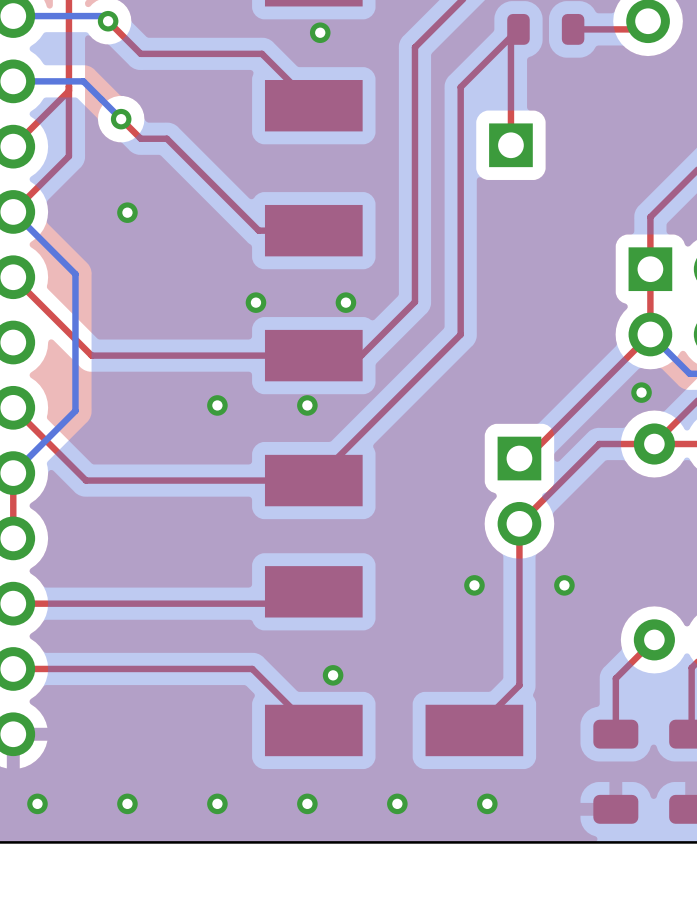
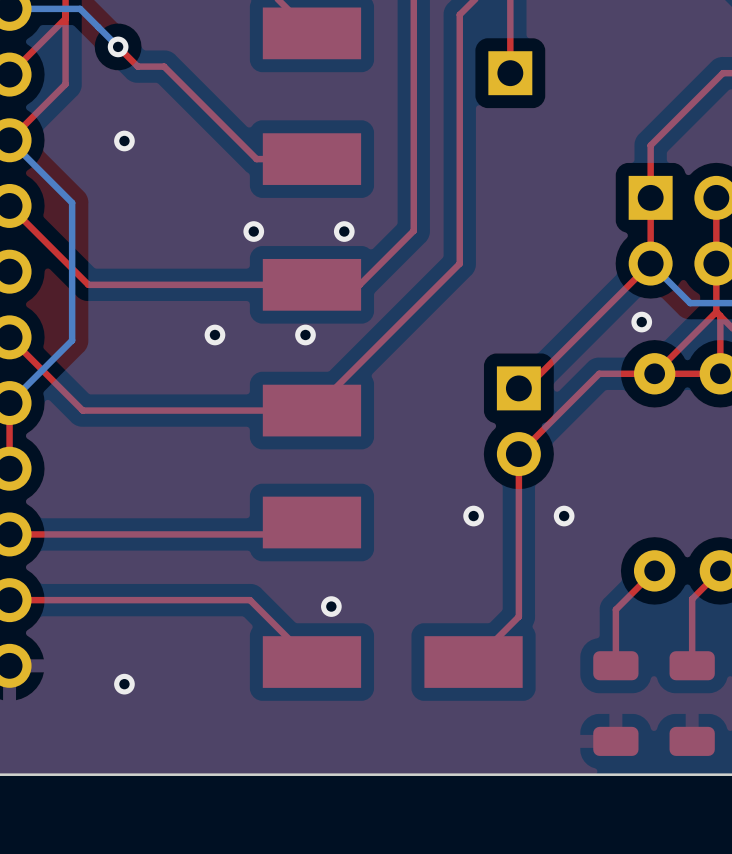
via: (37, 803) -> none
via position: (127, 803) -> (124, 684)
via: (217, 803) -> none
via: (307, 803) -> none
via: (397, 803) -> none
via: (487, 803) -> none

